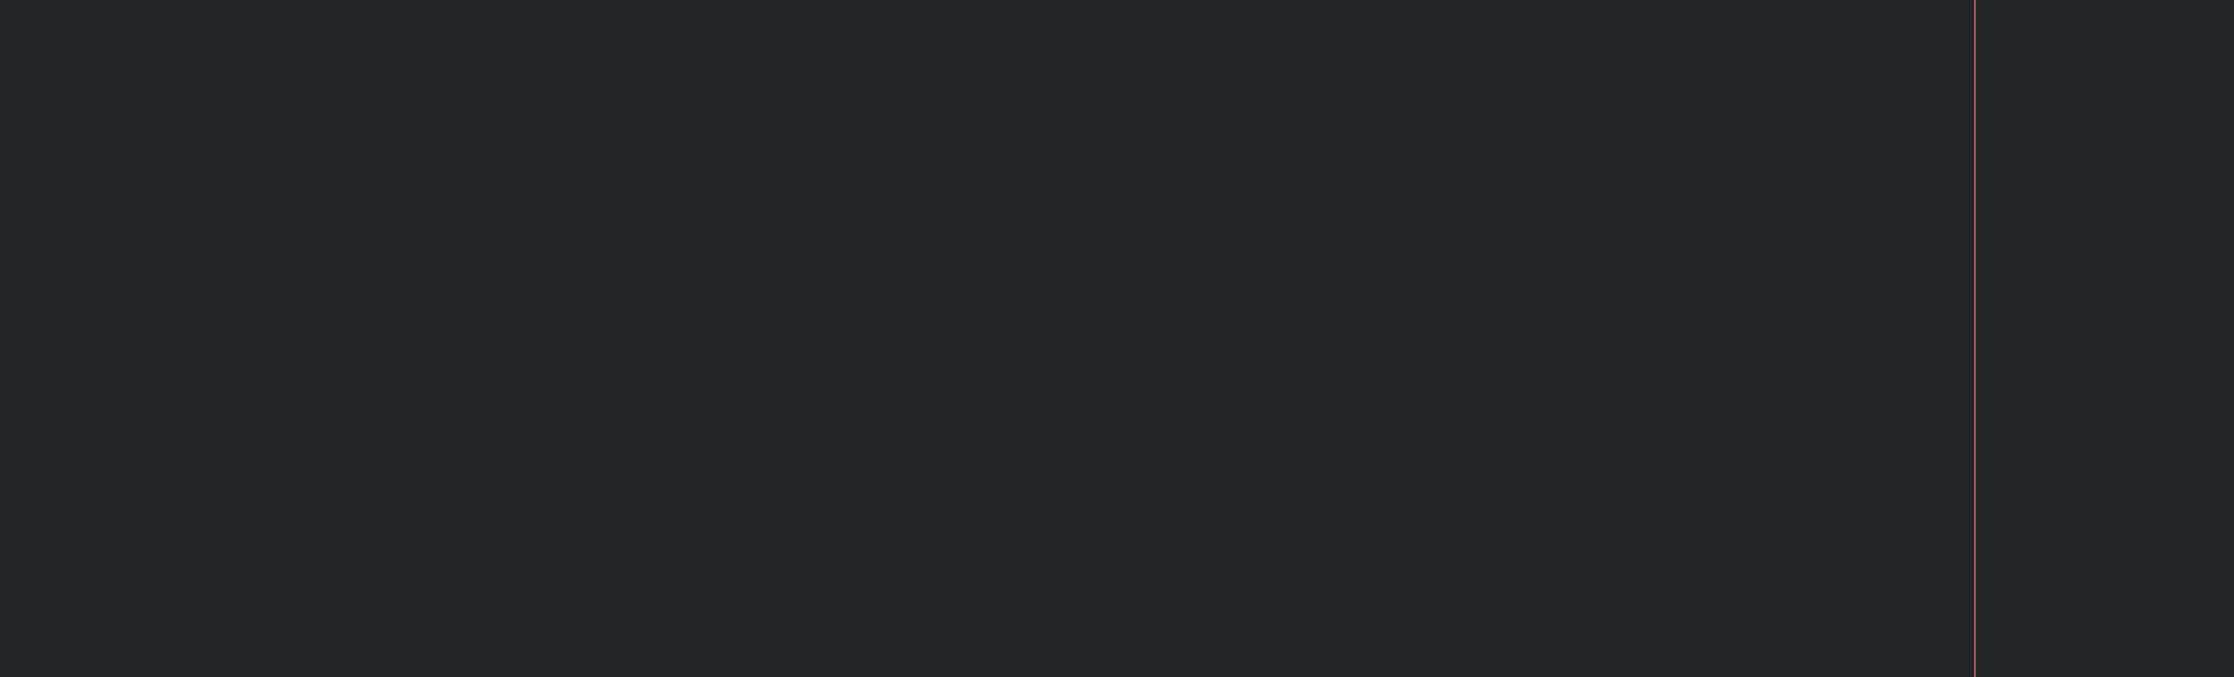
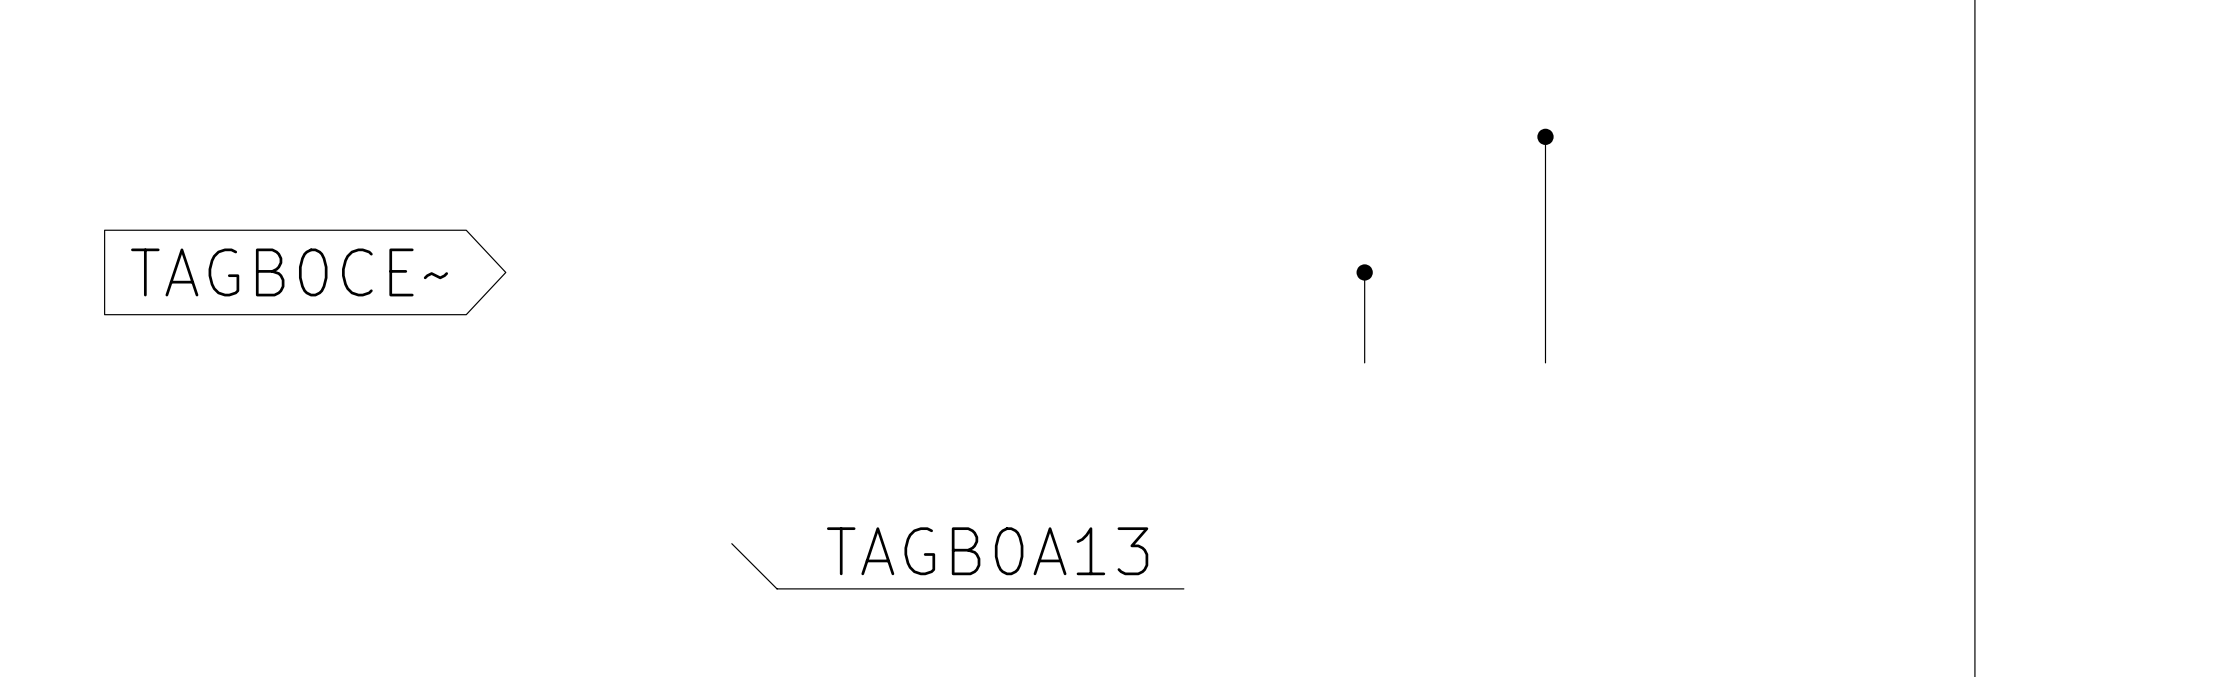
wire: none -> (1545, 136) (1545, 362)
junction: none -> (1545, 136)
global label: none -> TAGB0CE~ (289, 272)
wire: none -> (1364, 272) (1364, 362)
junction: none -> (1364, 272)
wire: none -> (731, 543) (777, 588) (1183, 588)
label: none -> TAGB0A13 (987, 551)

